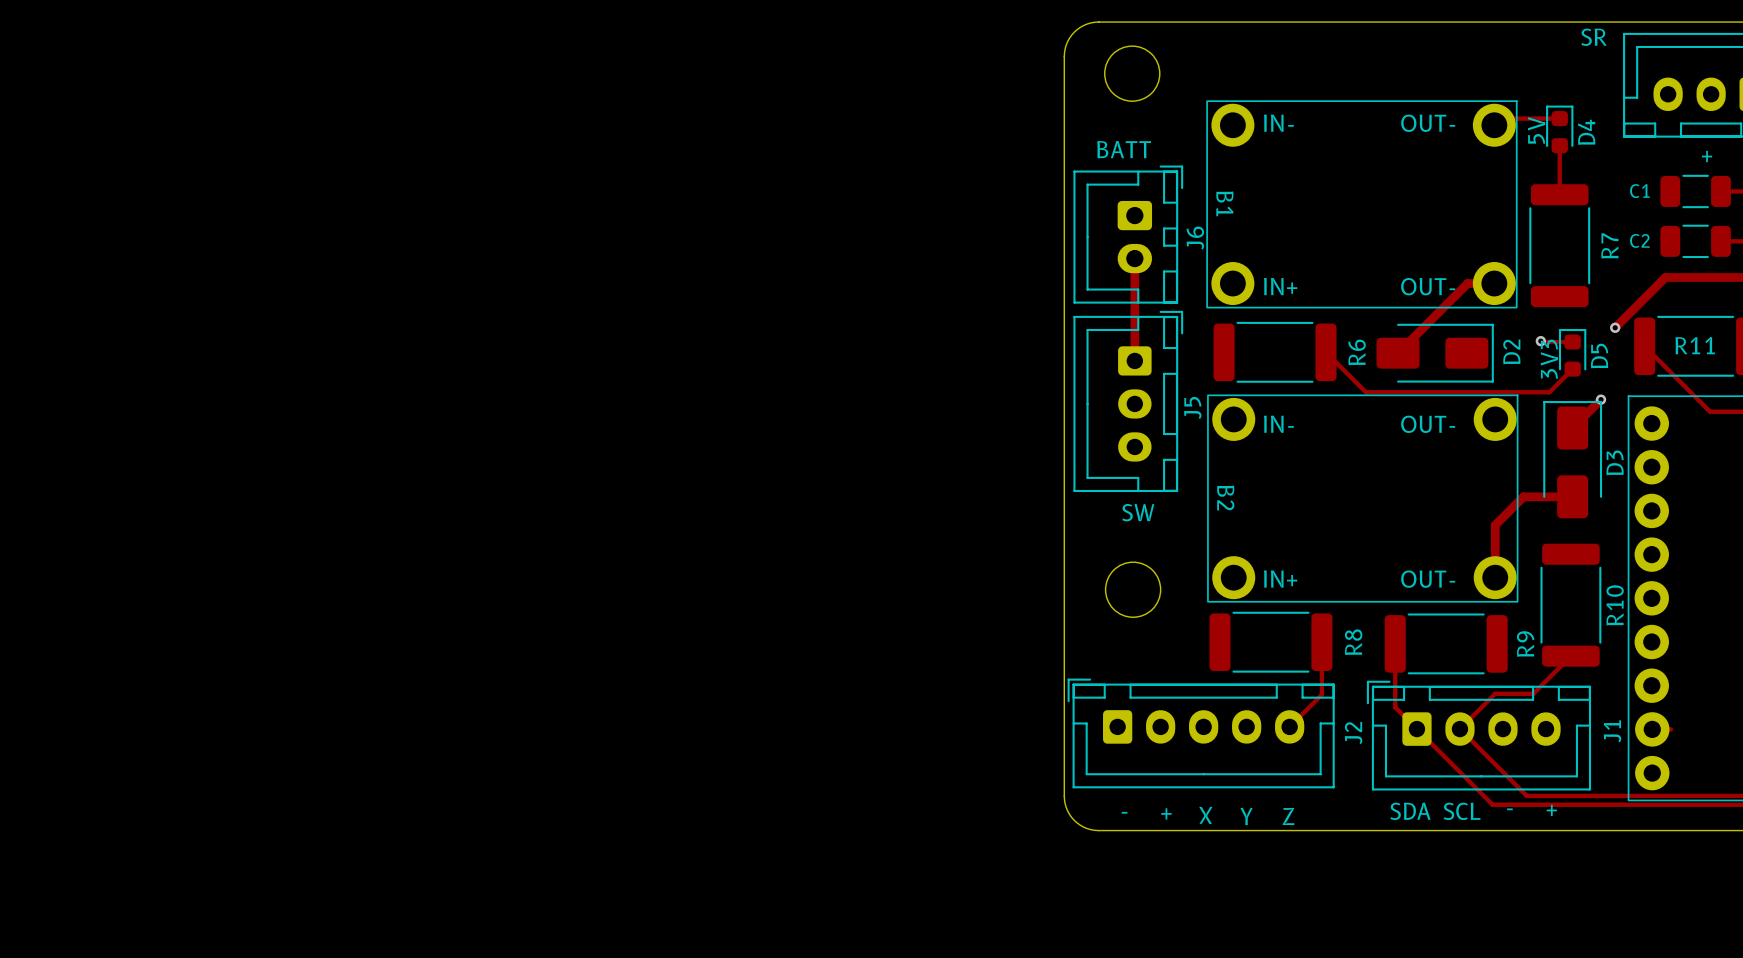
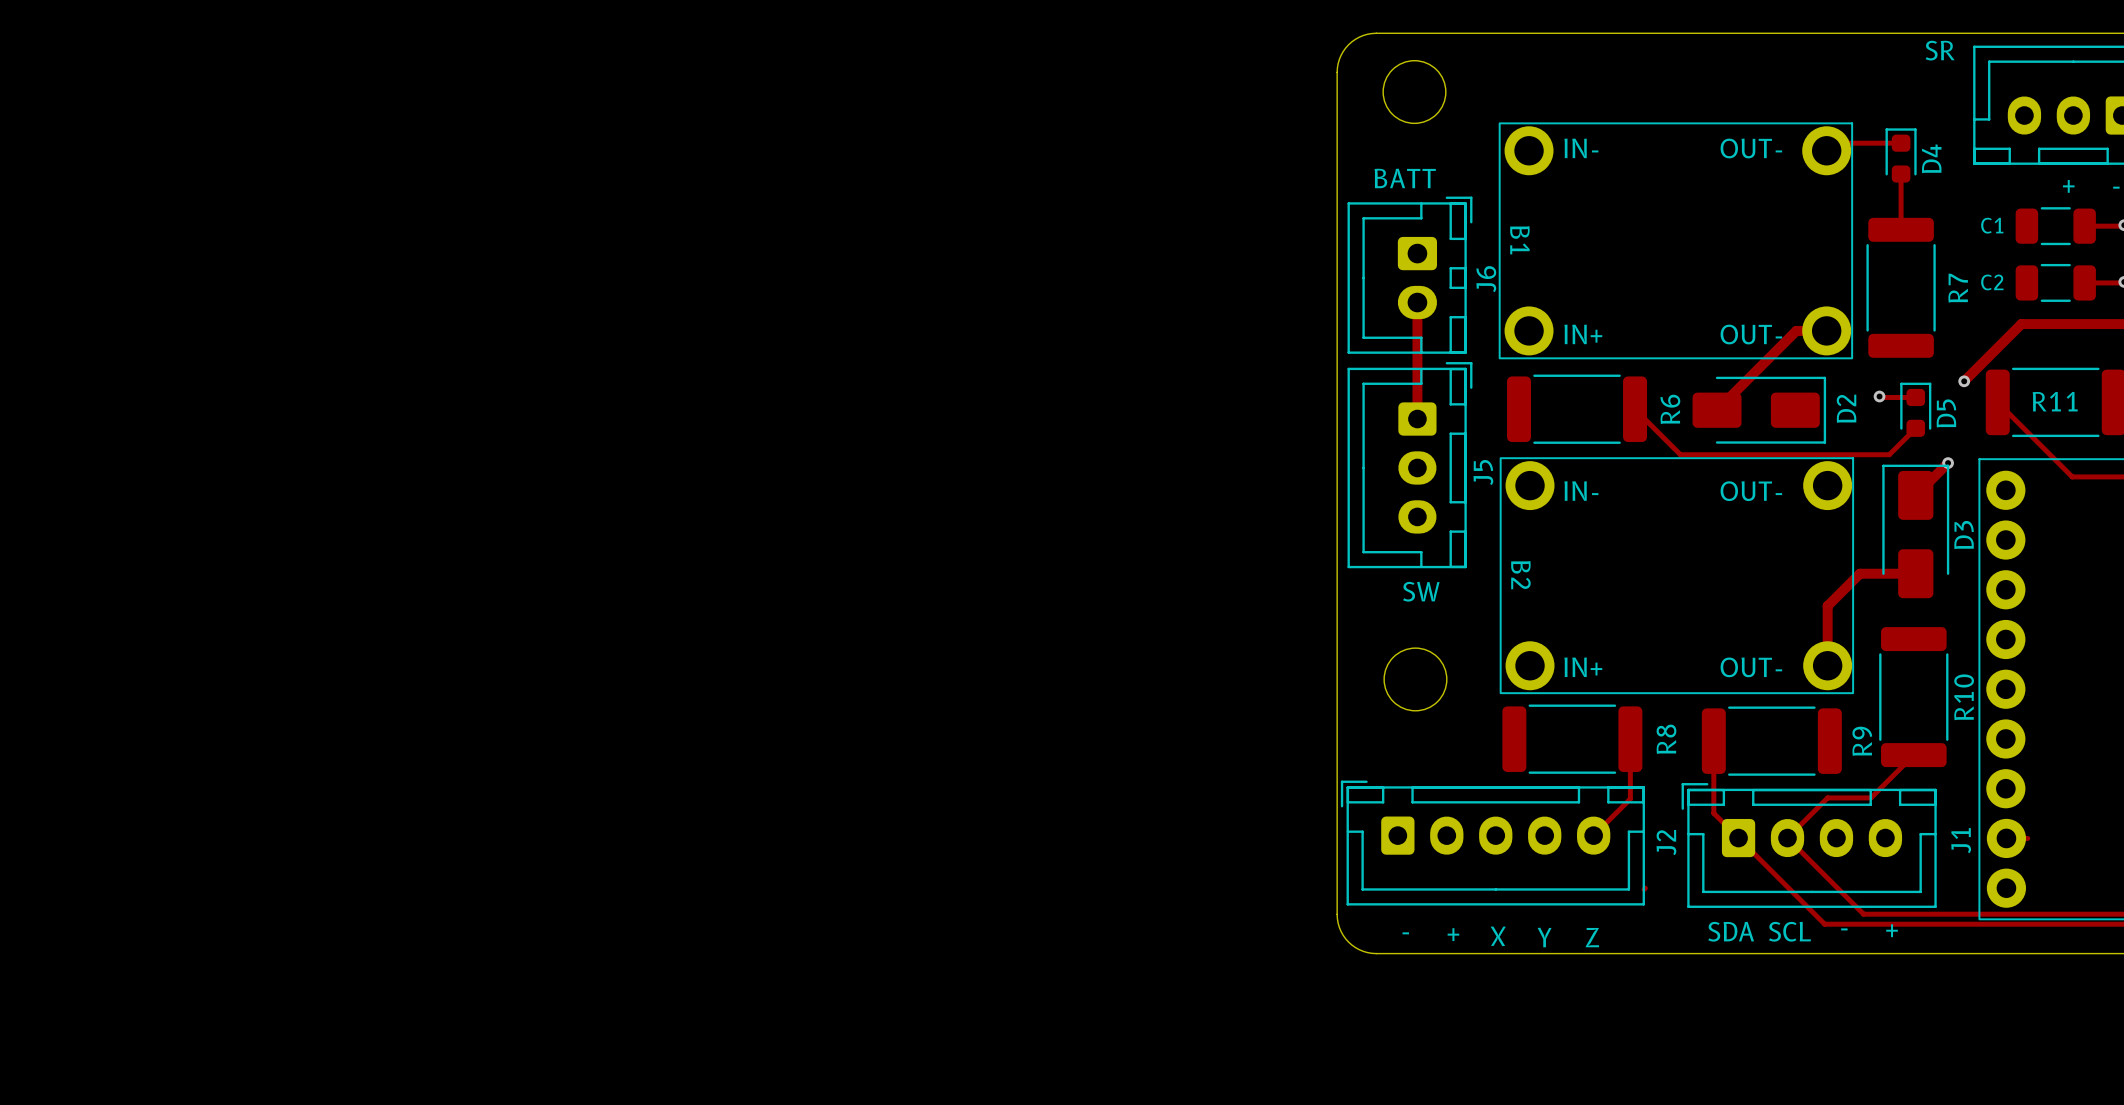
text: 5V (1536, 130) -> none
text: 3V3 (1549, 359) -> none
track: none -> (1645, 888) (1644, 889)

